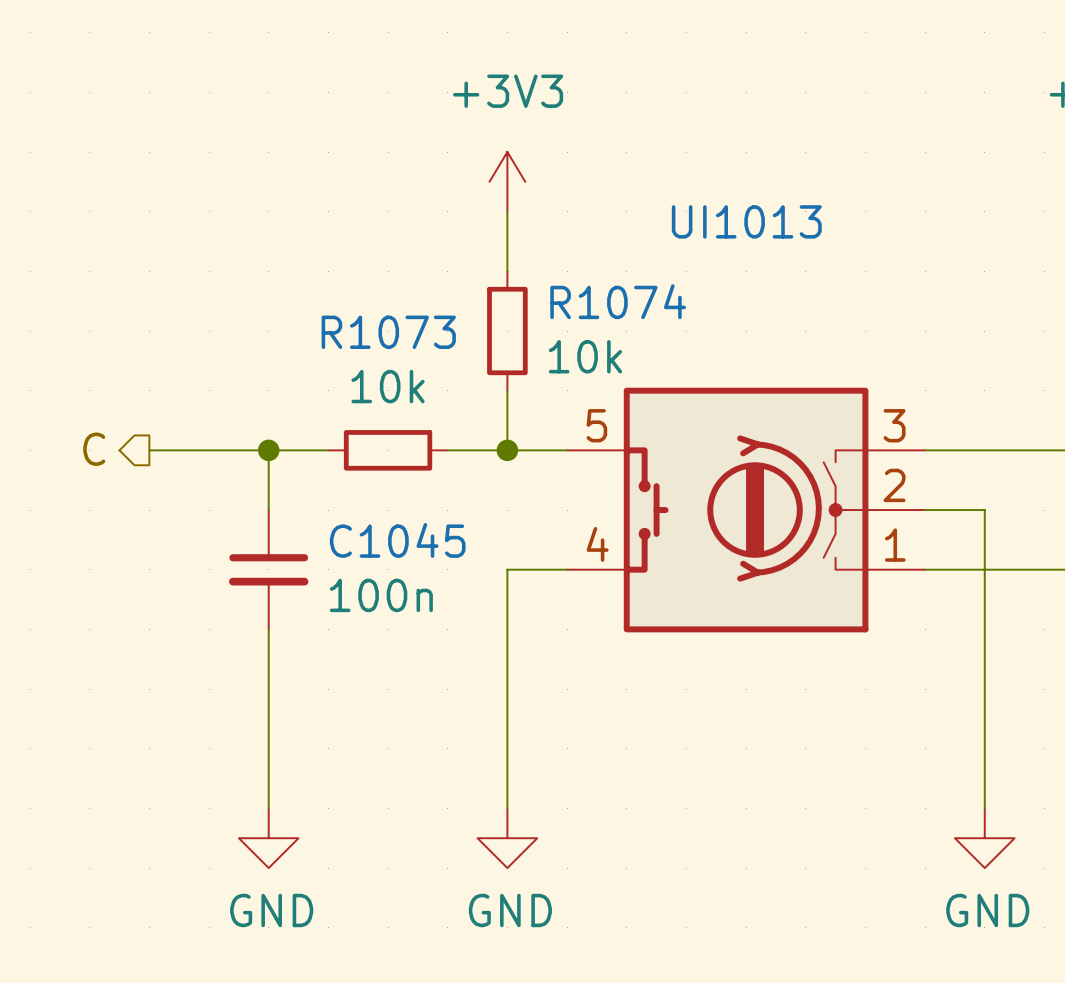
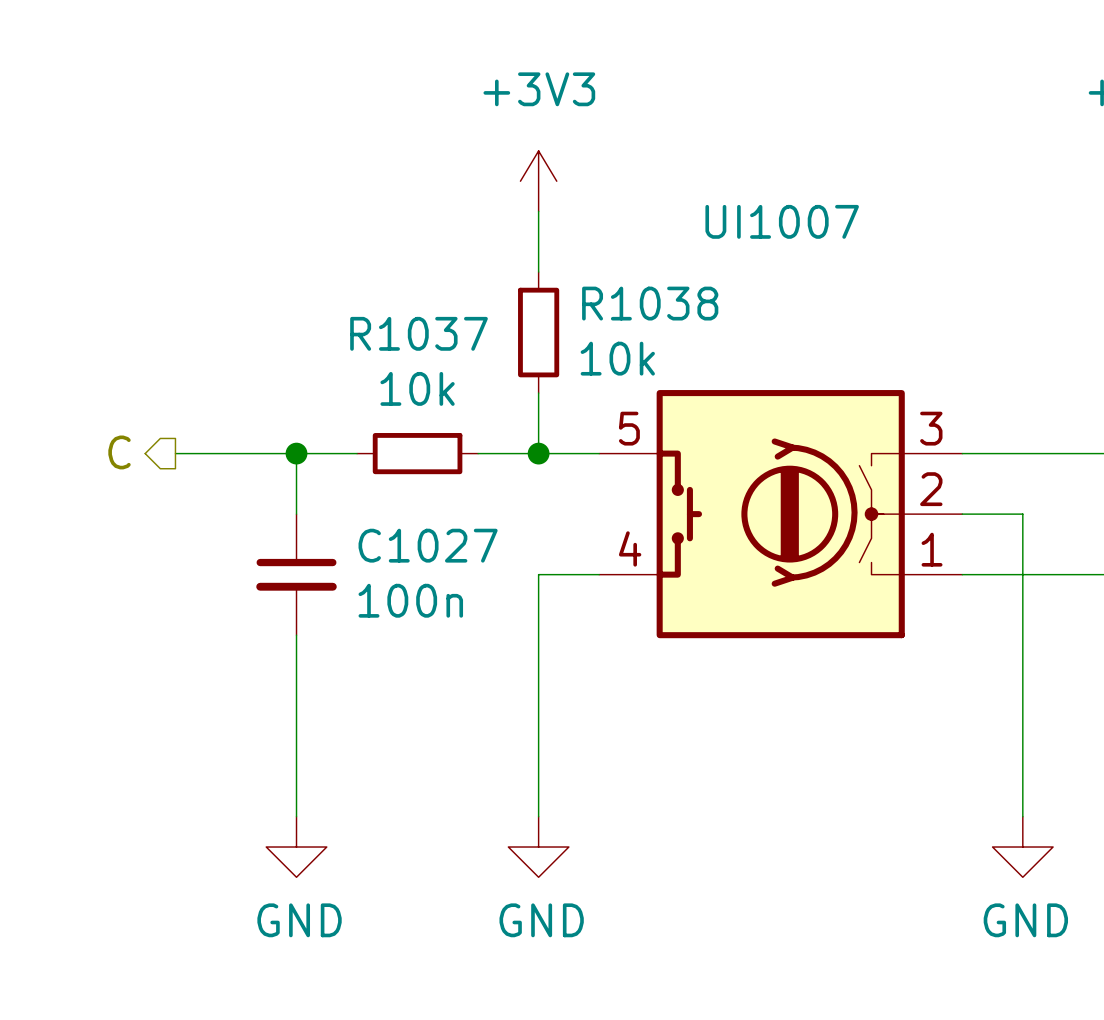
UI1013 name: UI1013 (746, 221) -> UI1007 (782, 221)
R1074 name: R1074 (618, 301) -> R1038 (650, 303)
R1073 name: R1073 (388, 332) -> R1037 (419, 333)
C1045 name: C1045 (397, 540) -> C1027 (428, 545)

